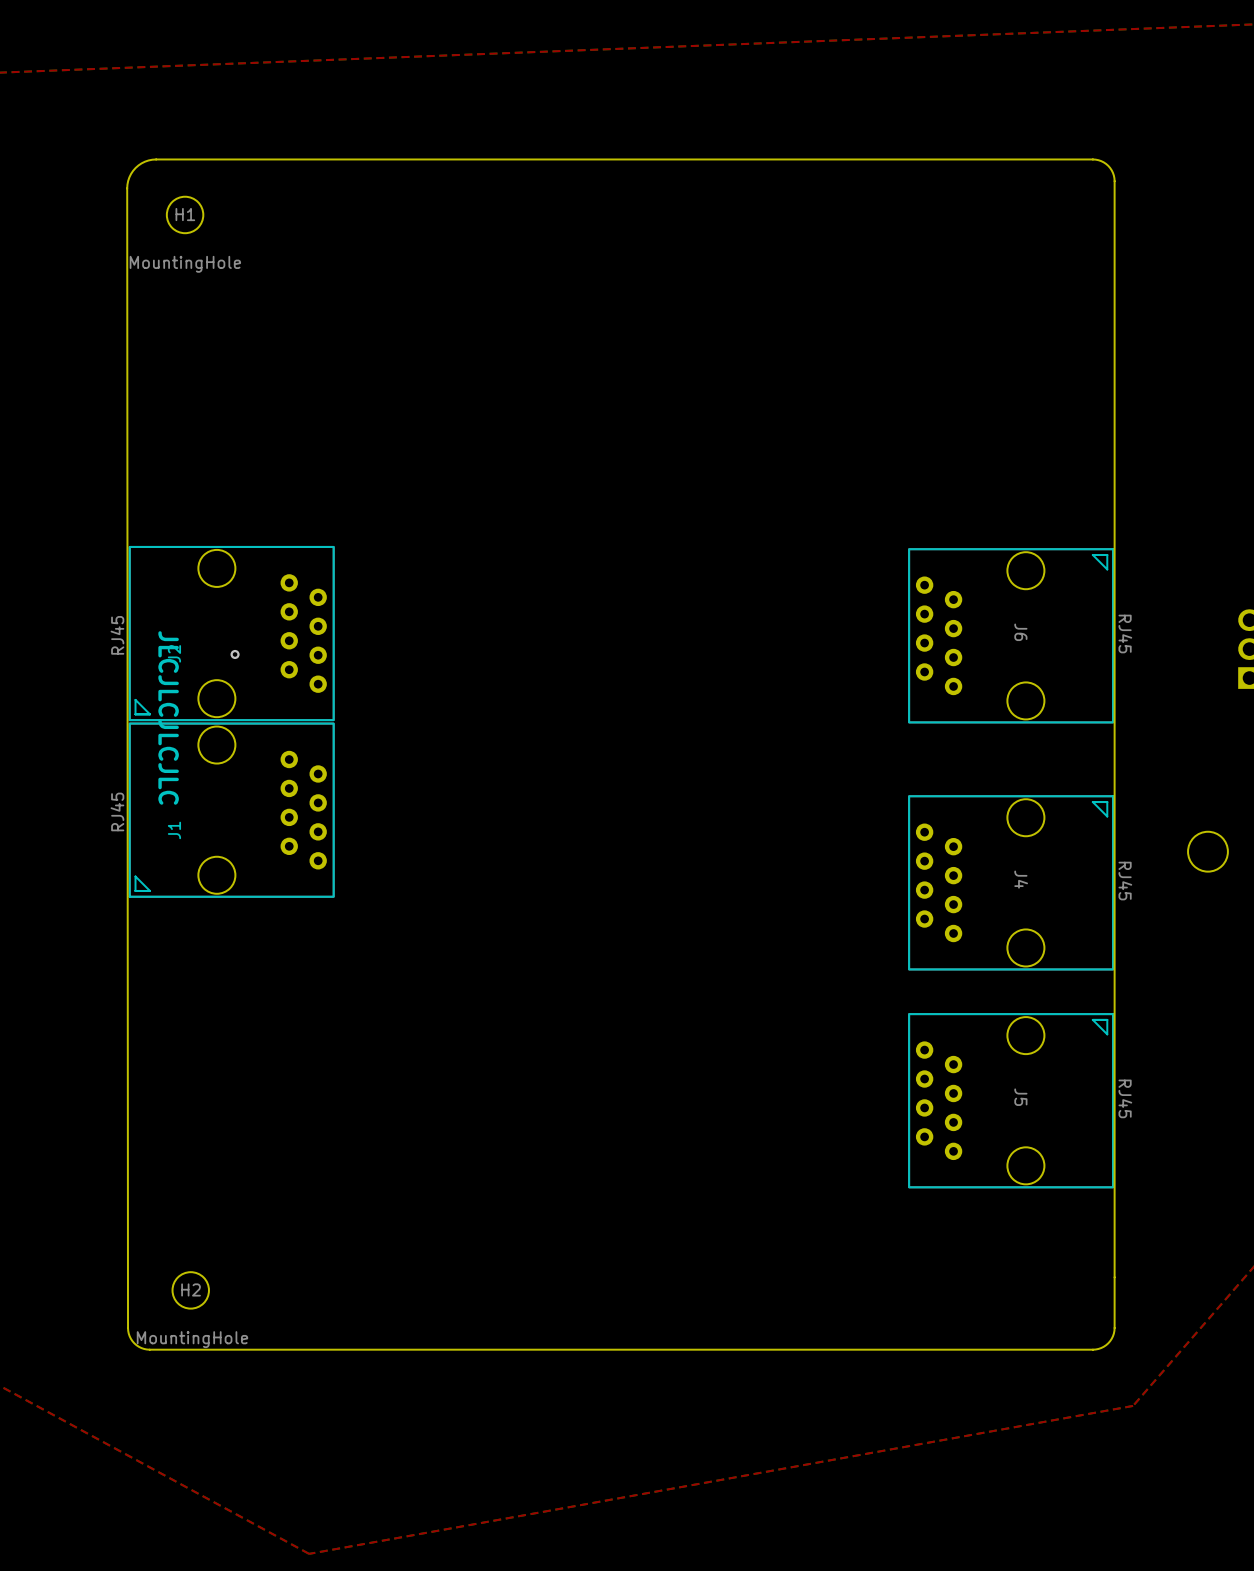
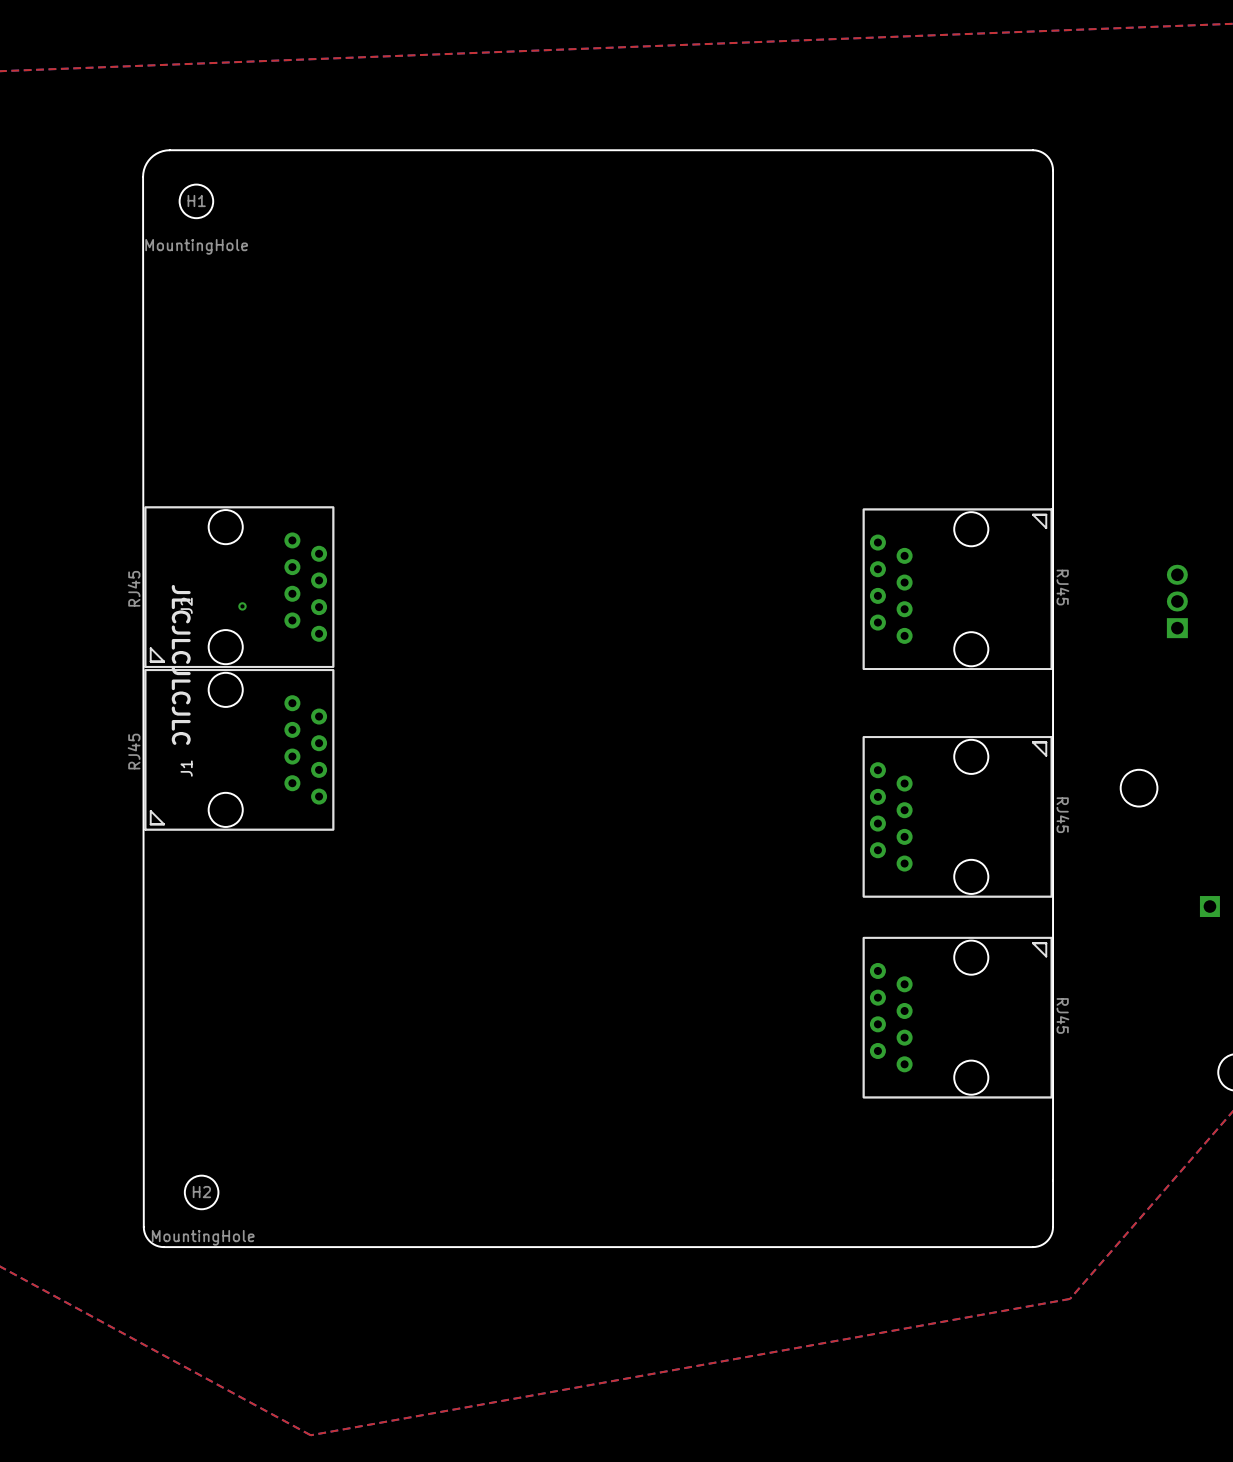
J6 name: J6 (1020, 632) -> none
J4 name: J4 (1021, 879) -> none
J5 name: J5 (1020, 1097) -> none

